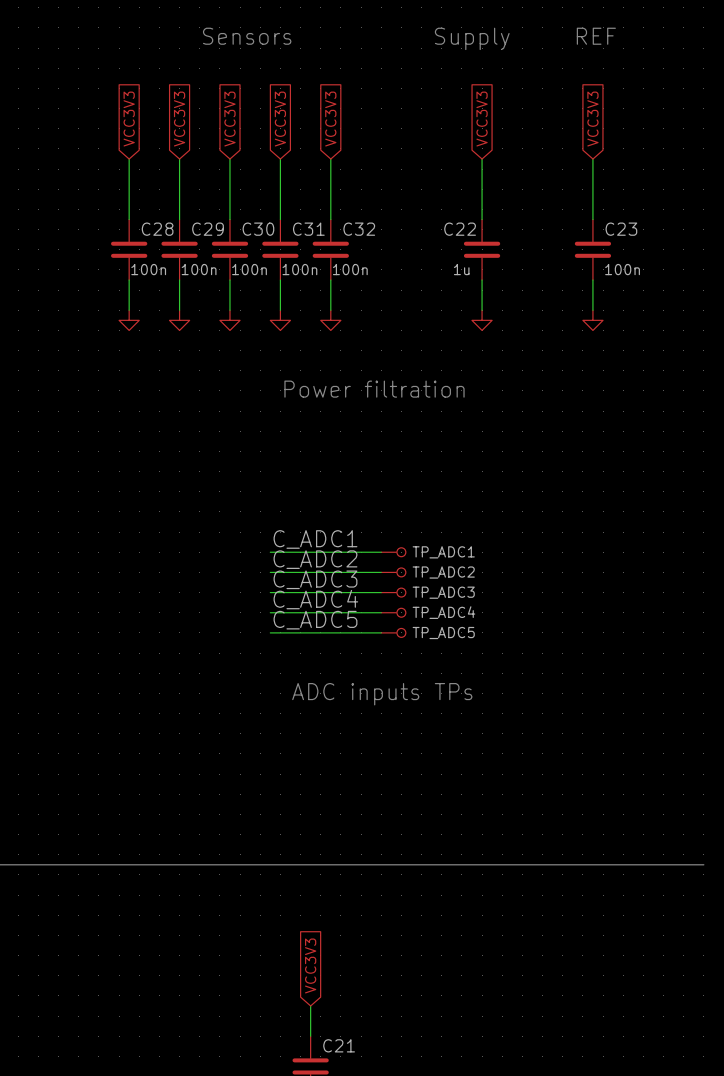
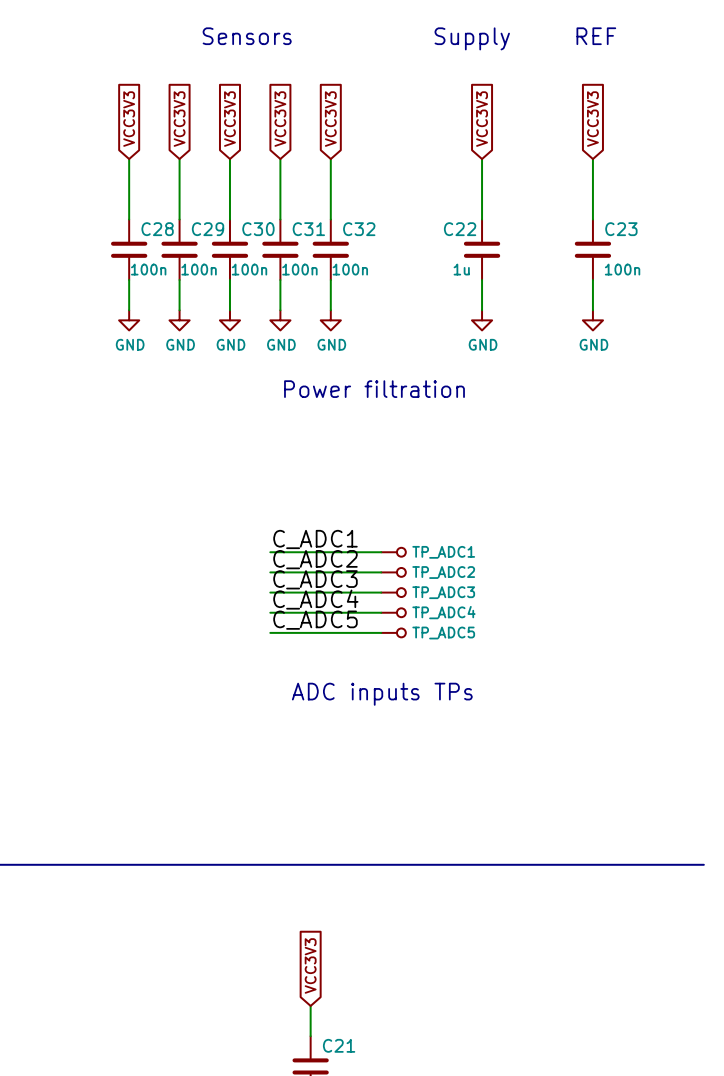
power symbol text: none -> GND (130, 344)
power symbol text: none -> GND (180, 344)
power symbol text: none -> GND (230, 344)
power symbol text: none -> GND (281, 344)
power symbol text: none -> GND (331, 344)
power symbol text: none -> GND (483, 344)
power symbol text: none -> GND (593, 344)

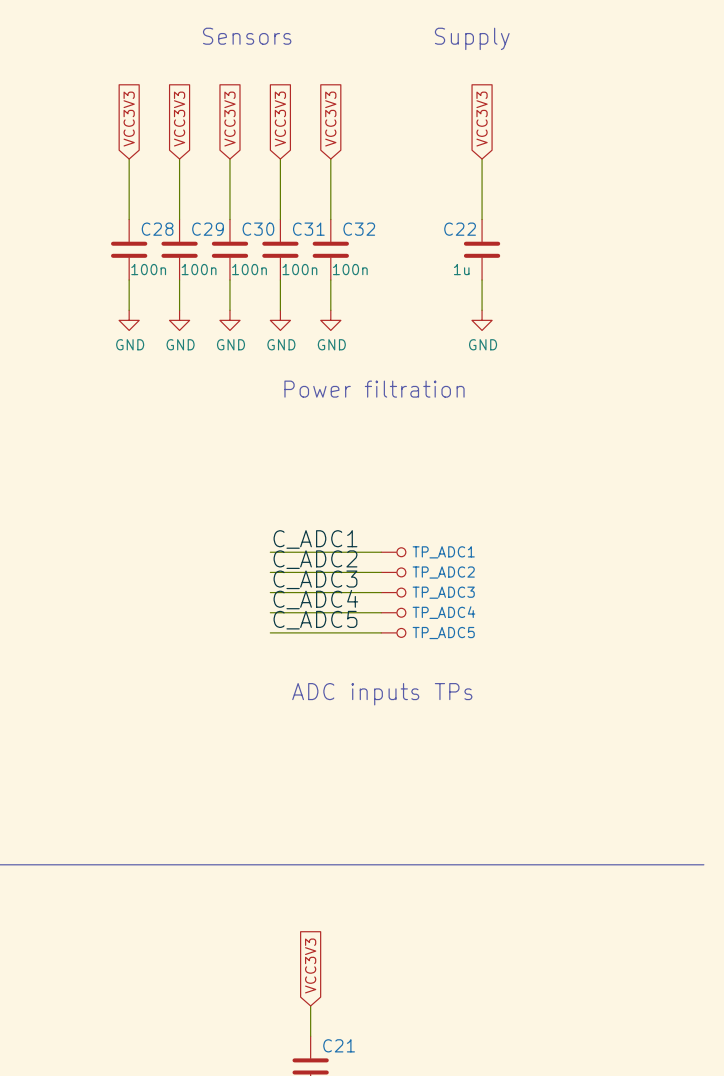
text: REF (596, 36) -> none
global label: VCC3V3 (592, 119) -> none
wire: (592, 159) (592, 219) -> none
C23: (592, 249) -> none
wire: (592, 280) (592, 310) -> none
power symbol: GND (592, 320) -> none

